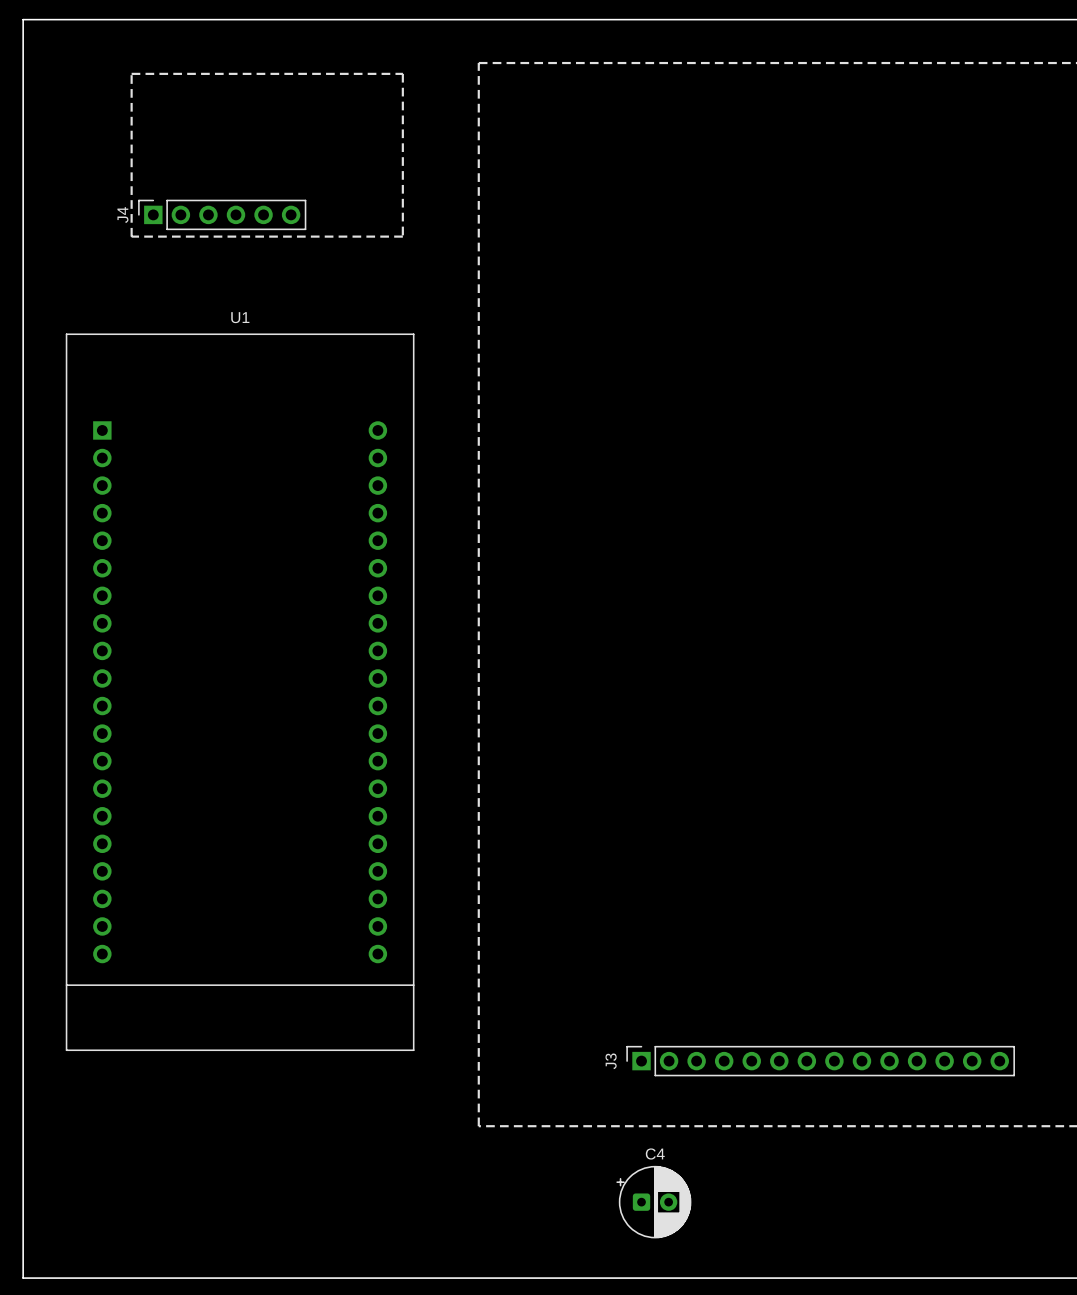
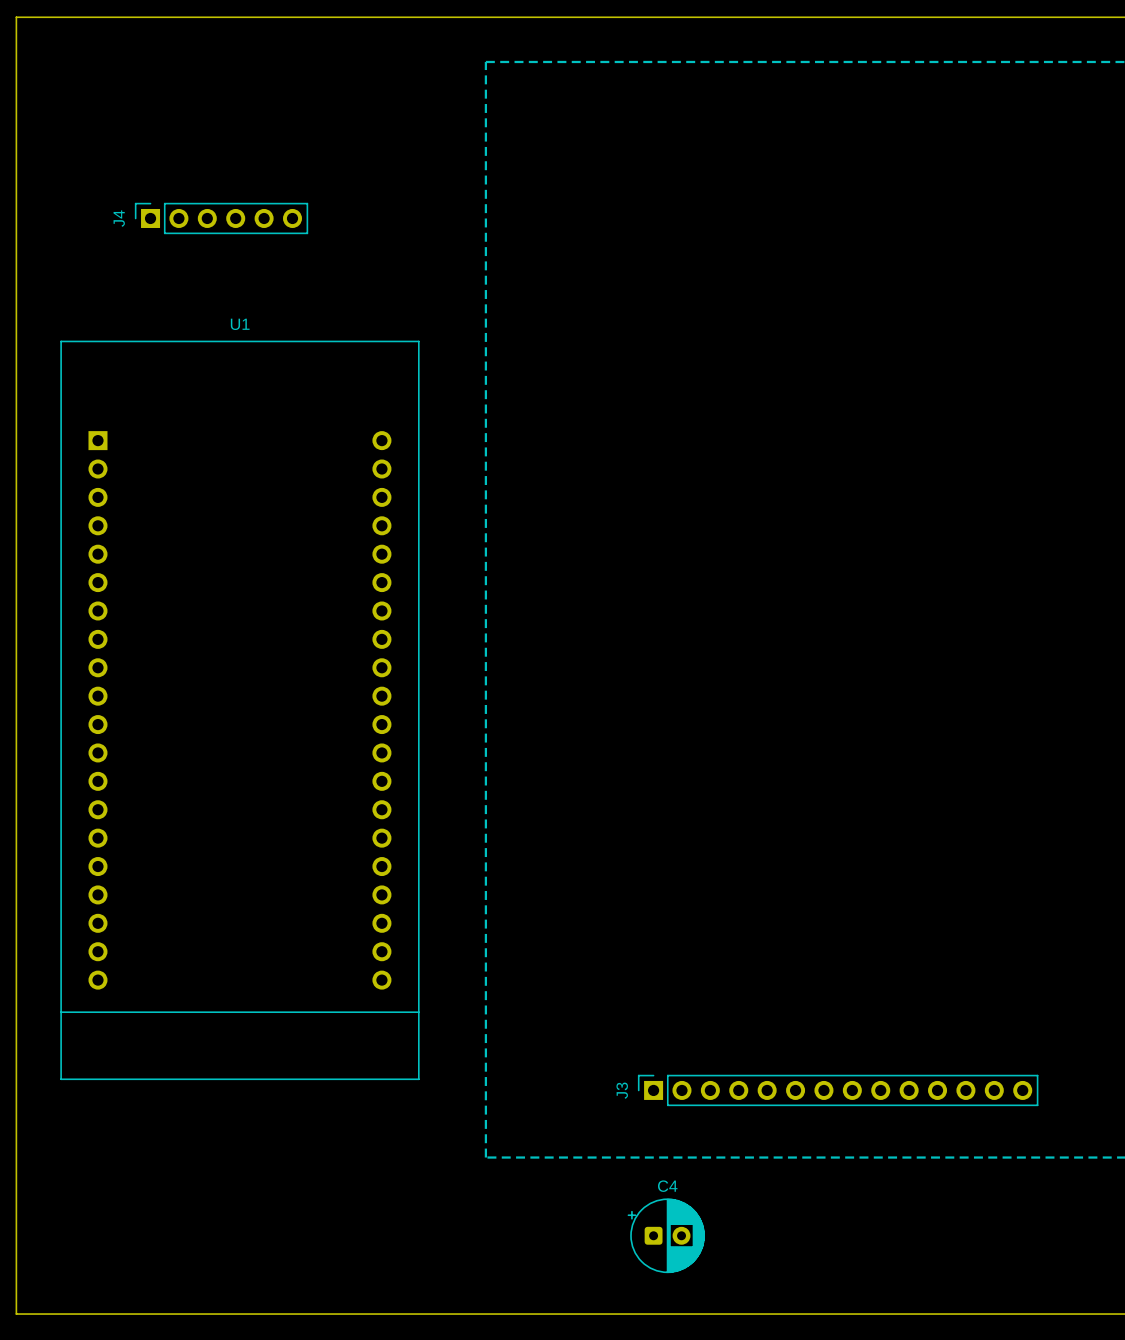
line: (131, 73) (402, 73) (402, 236) (131, 236) (131, 73) -> none

